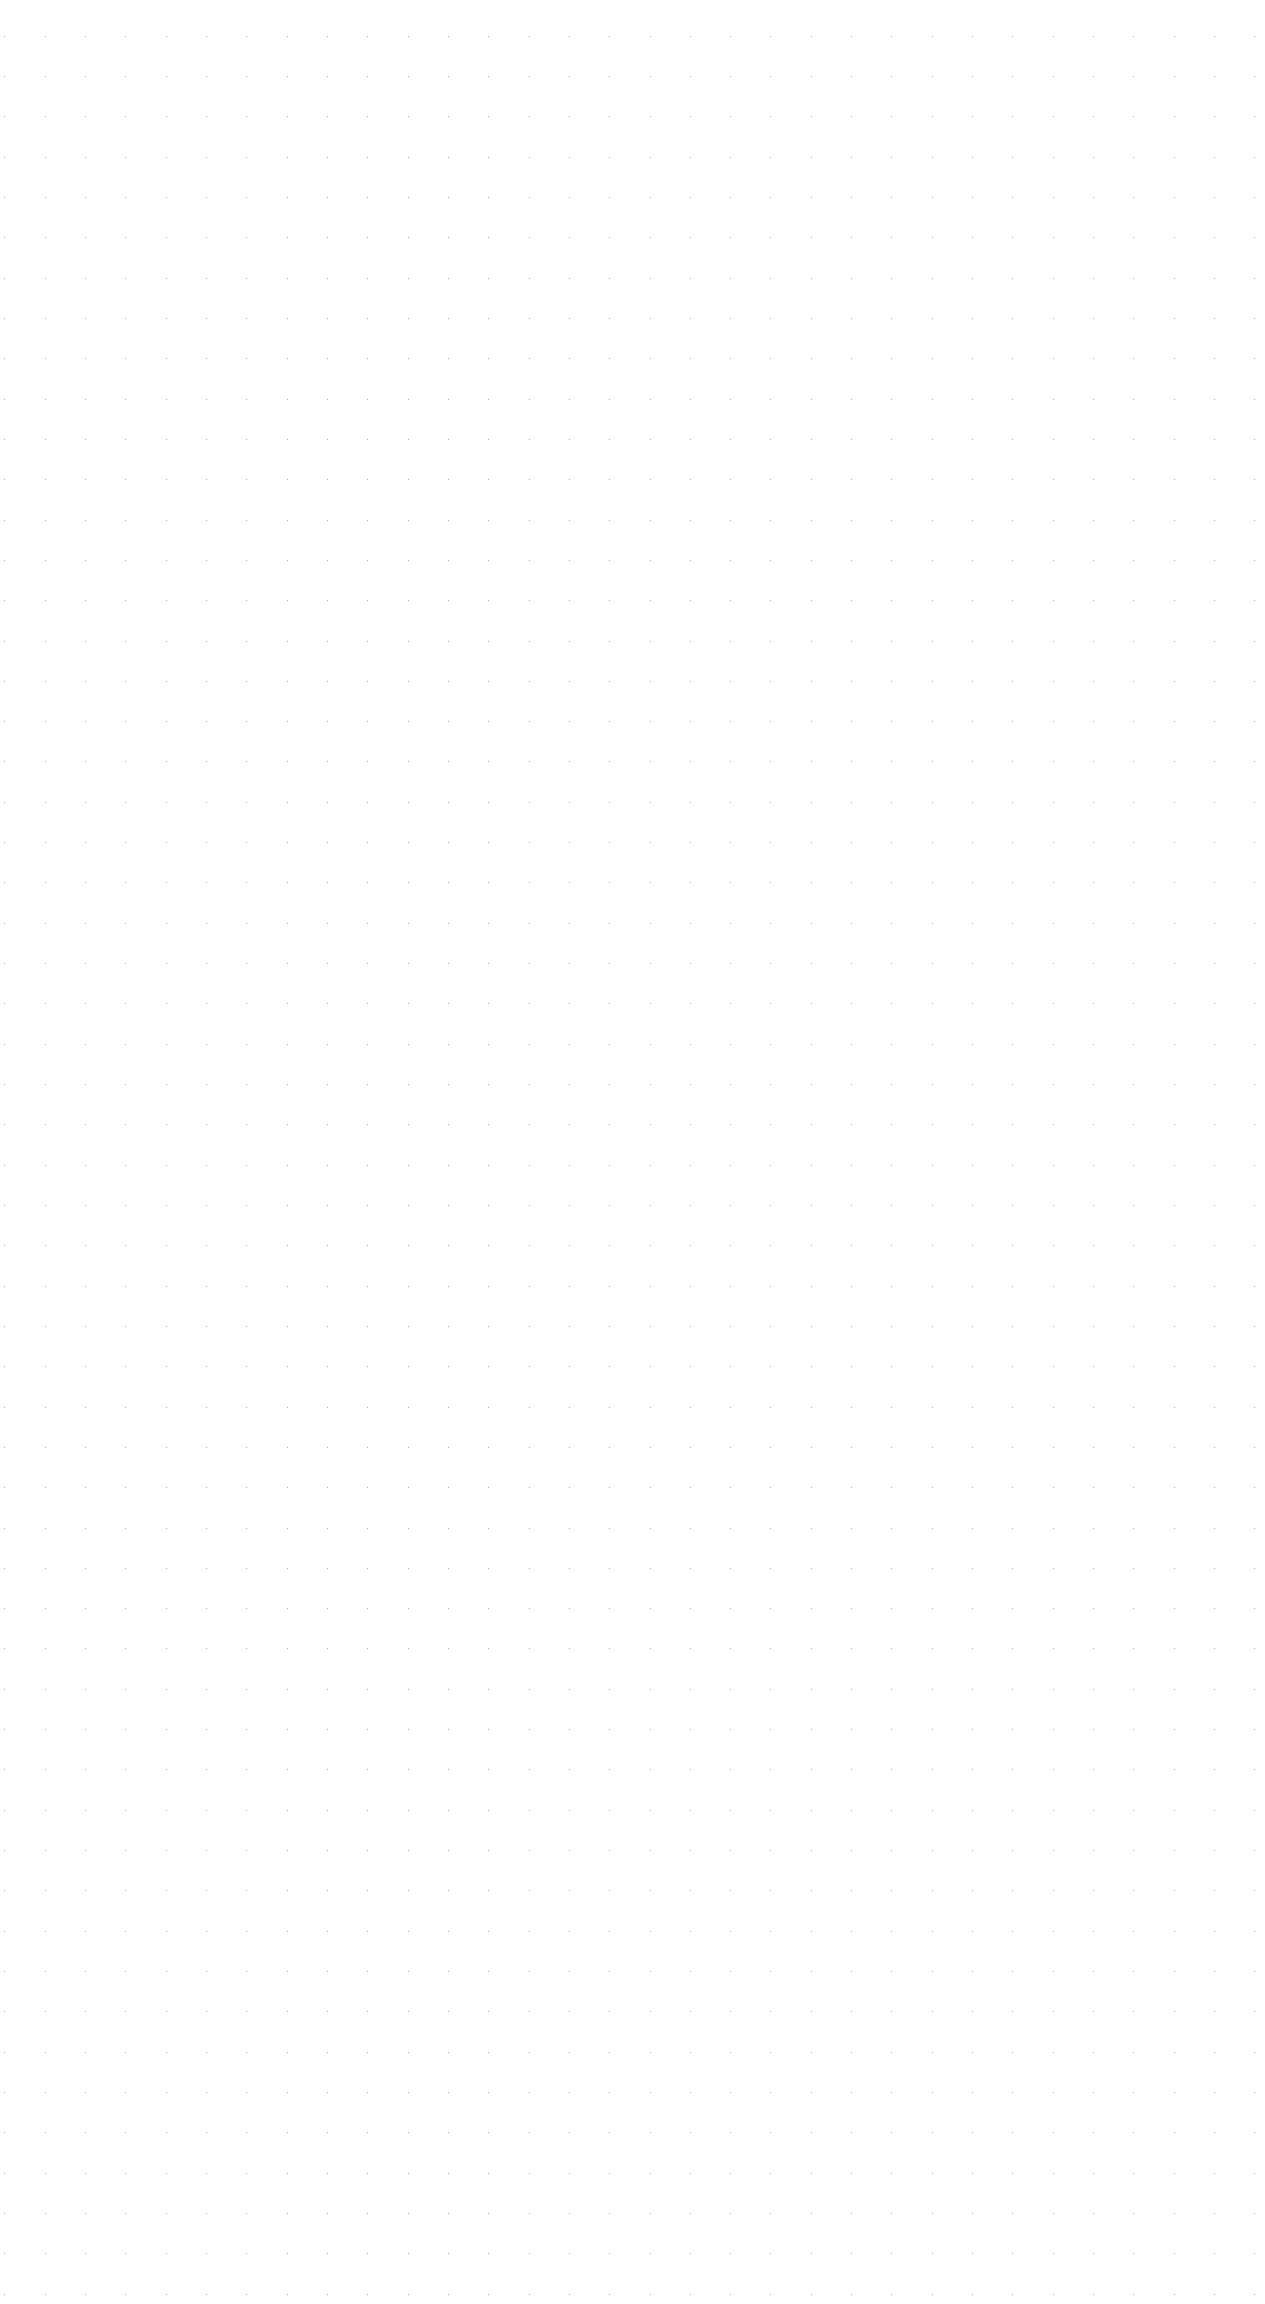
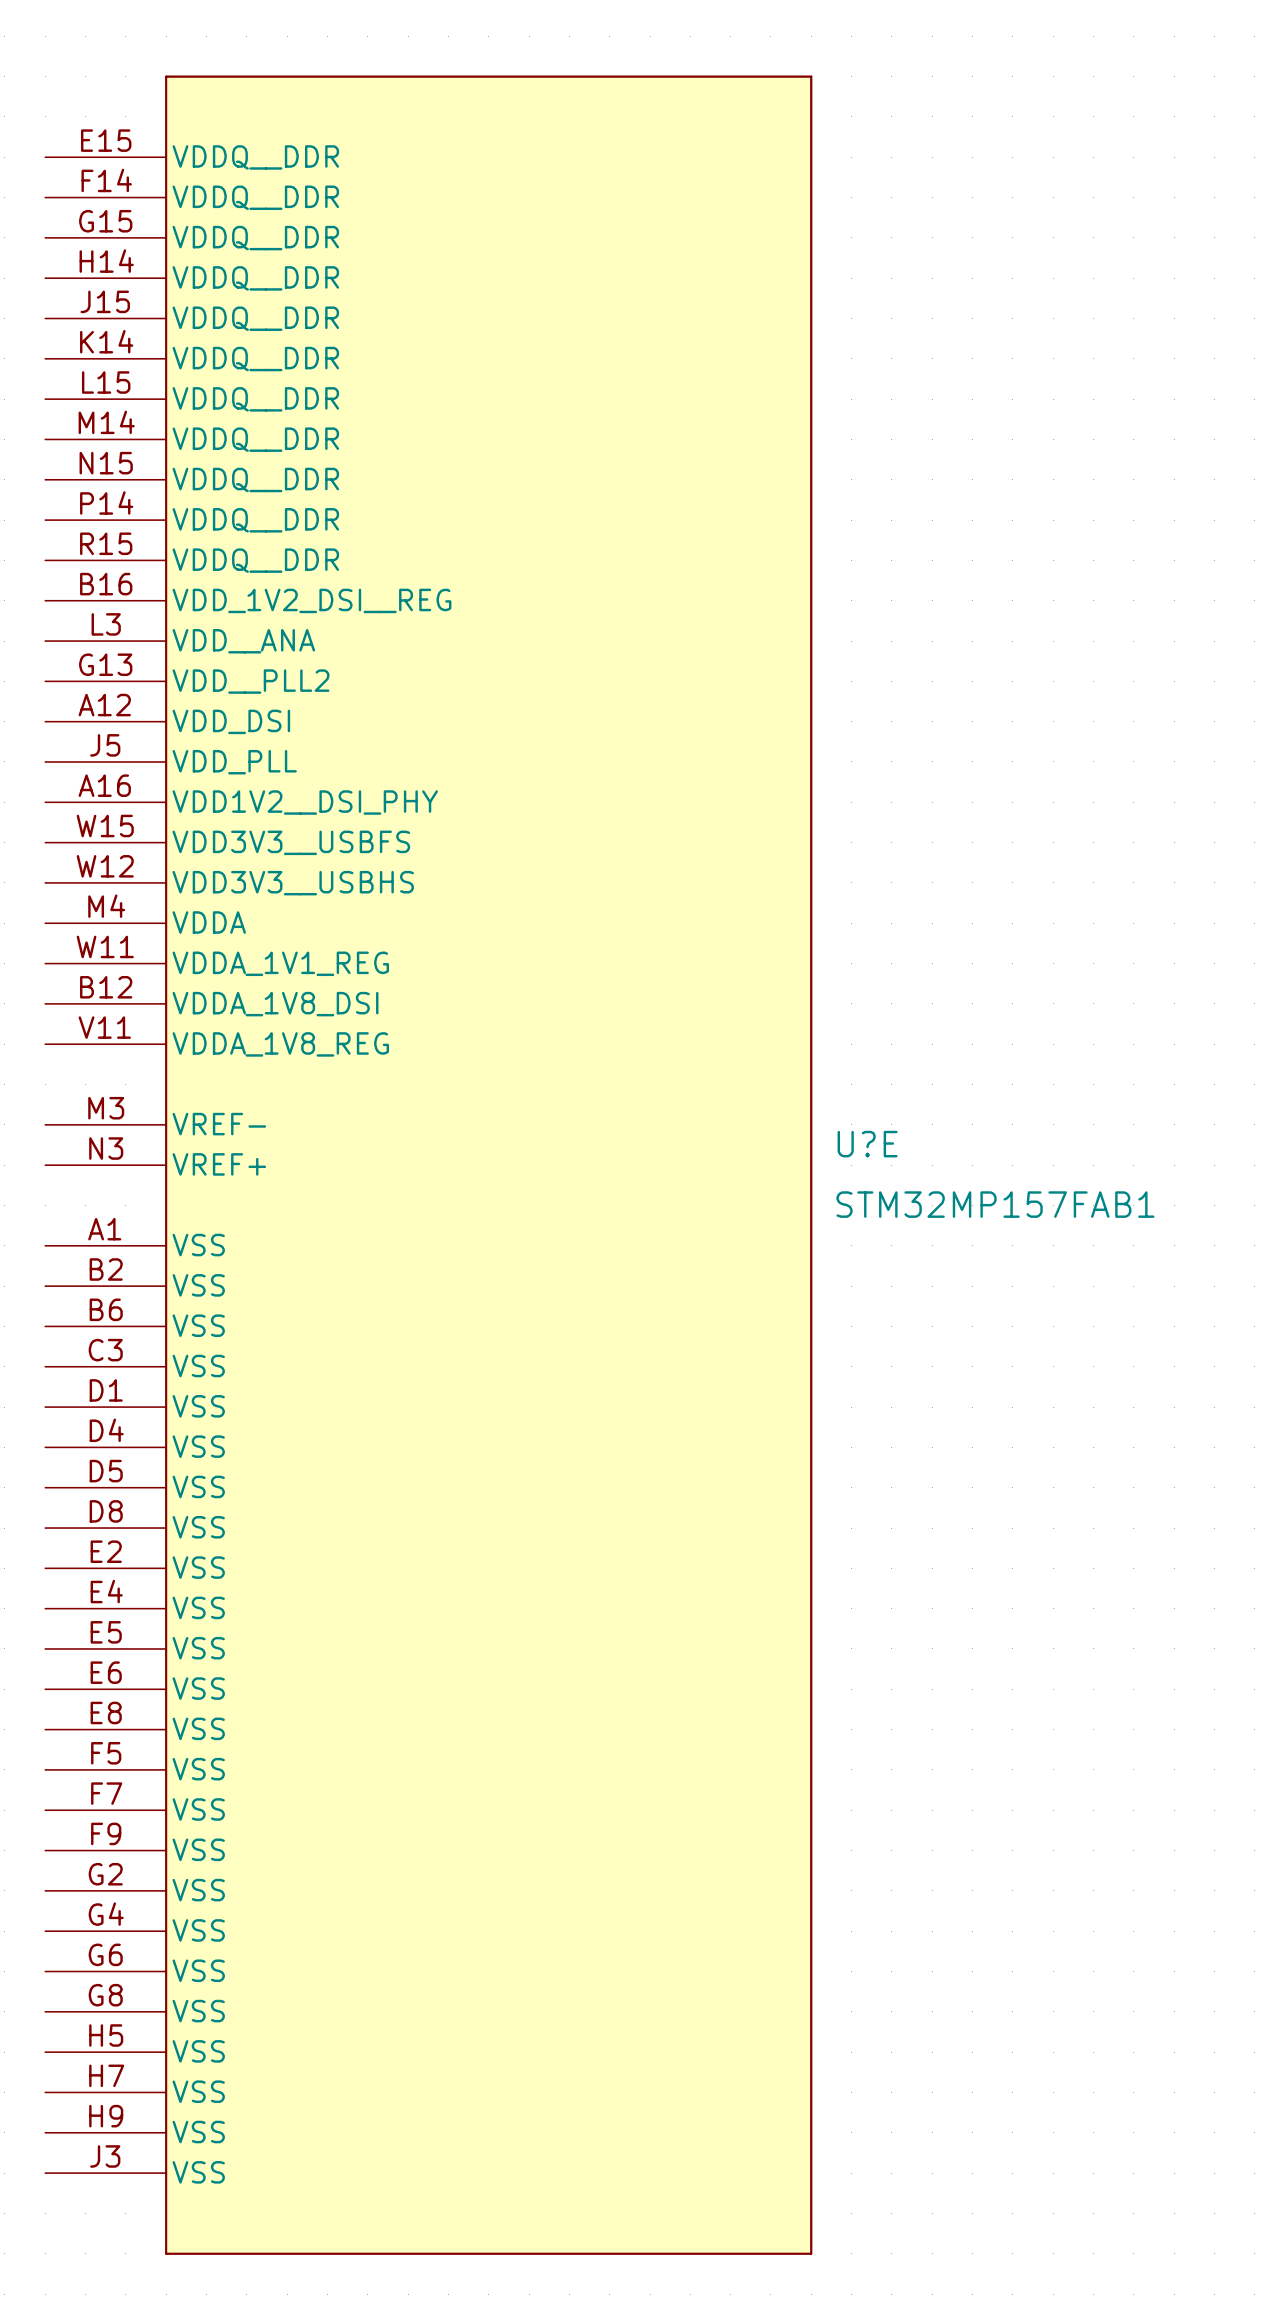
U?E: none -> STM32MP157FAB1 (428, 1165)

